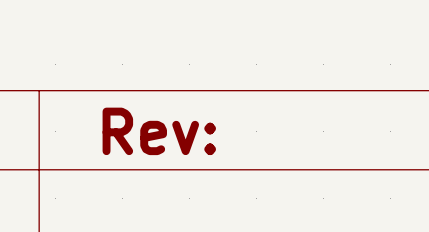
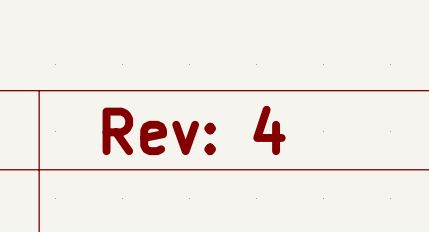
title block: Rev: (159, 131) -> Rev: 4 (194, 130)

